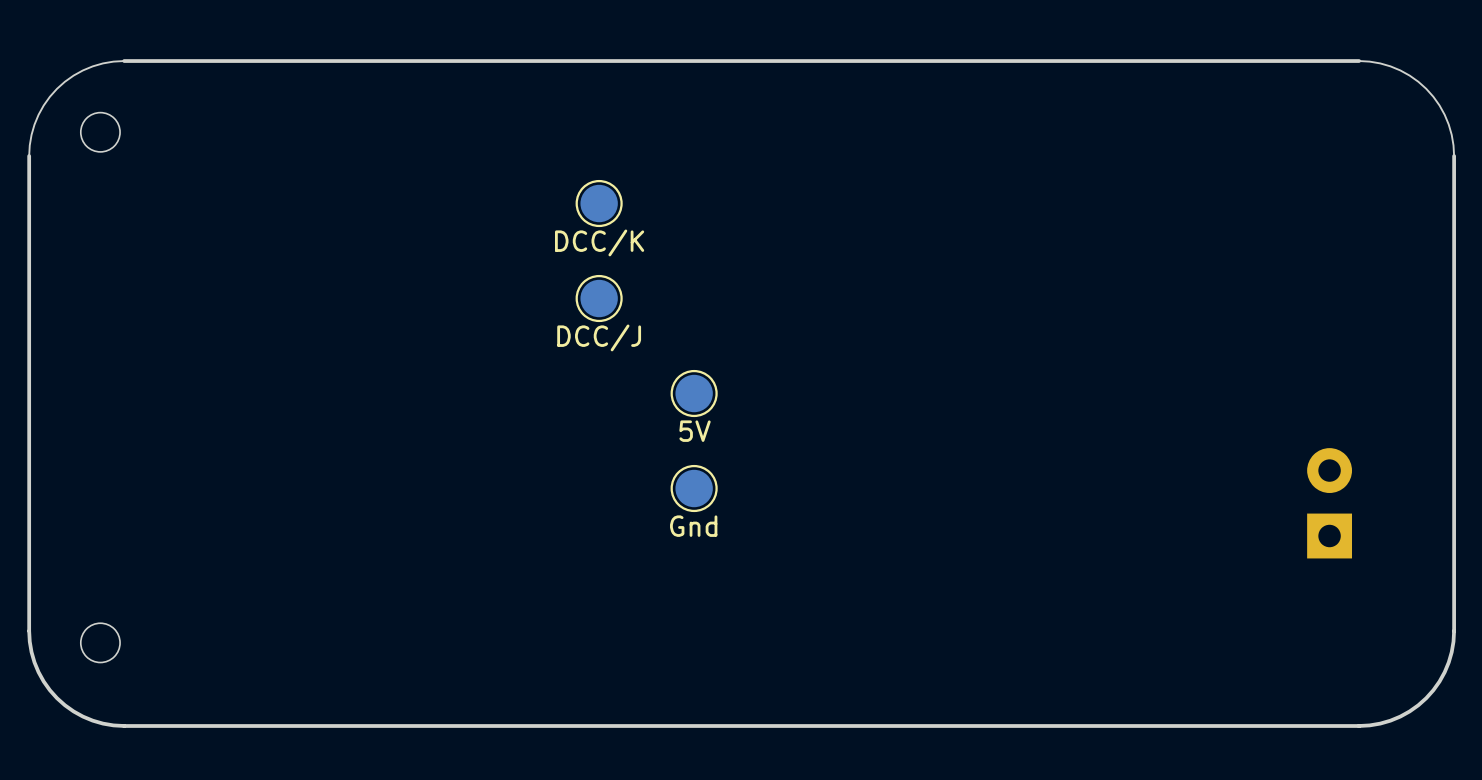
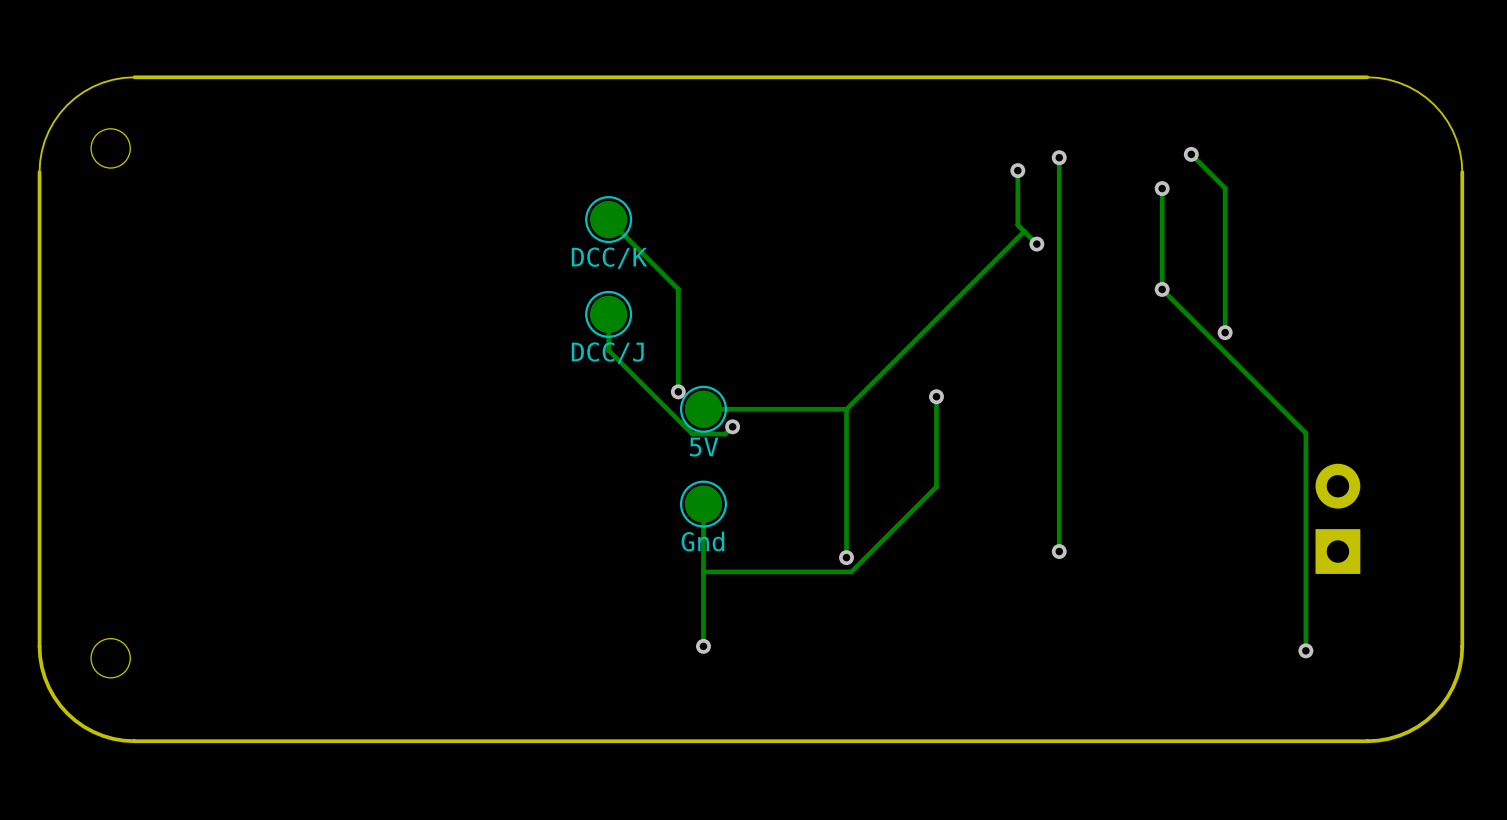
track: none -> (1191, 154) (1225, 188) (1225, 332)
via: none -> (1191, 154)
track: none -> (1059, 157) (1059, 551)
via: none -> (1059, 157)
track: none -> (1017, 170) (1017, 225) (1036, 244)
via: none -> (1017, 170)
track: none -> (1162, 188) (1162, 289) (1305, 433) (1305, 650)
via: none -> (1162, 188)
track: none -> (608, 219) (678, 289) (678, 391)
track: none -> (1024, 231) (846, 409)
via: none -> (1036, 244)
via: none -> (1162, 289)
track: none -> (608, 314) (608, 350) (692, 434) (725, 434) (732, 426)
via: none -> (1225, 332)
via: none -> (678, 391)
track: none -> (936, 396) (936, 486) (851, 571) (703, 571)
via: none -> (936, 396)
track: none -> (846, 409) (846, 557)
track: none -> (846, 409) (703, 409)
via: none -> (732, 426)
track: none -> (703, 504) (703, 646)
via: none -> (1059, 551)
via: none -> (846, 557)
via: none -> (703, 646)
via: none -> (1305, 650)

